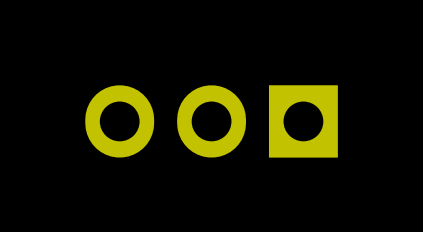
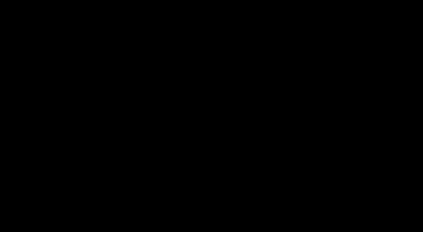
part: (211, 121) -> none

